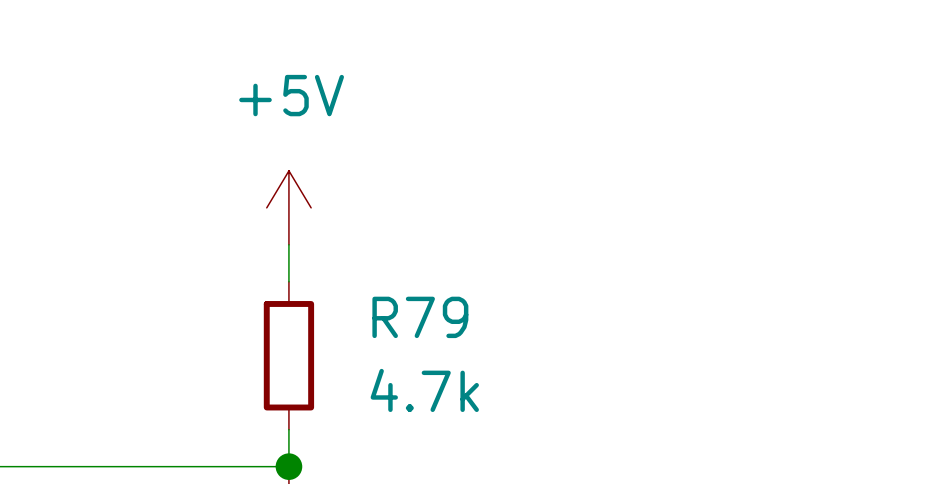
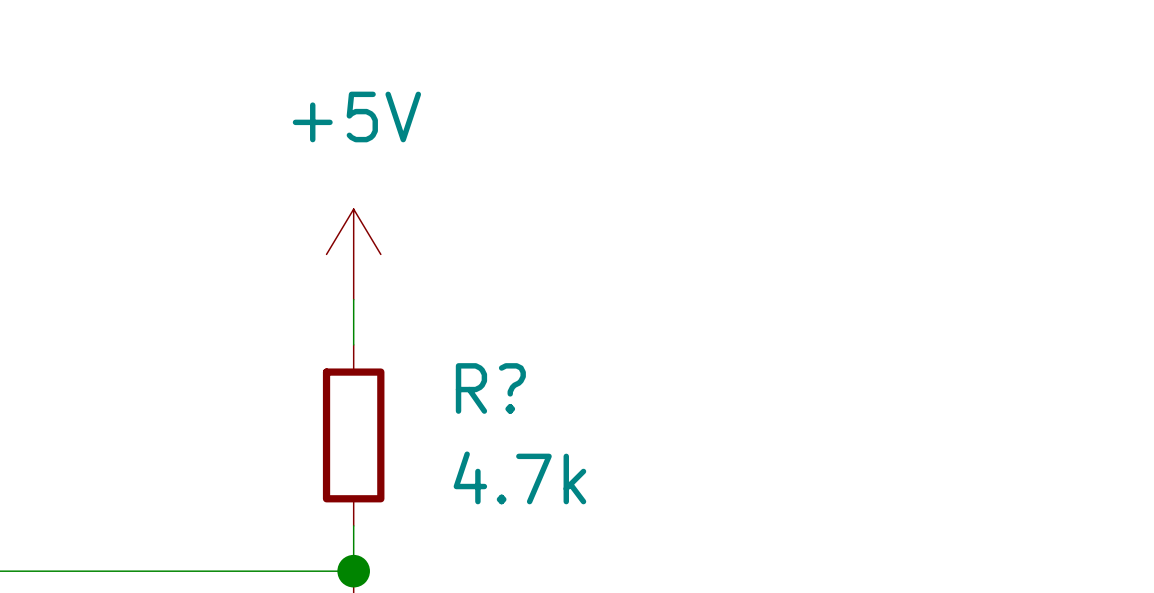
R79 name: R79 (420, 317) -> R? (490, 388)

